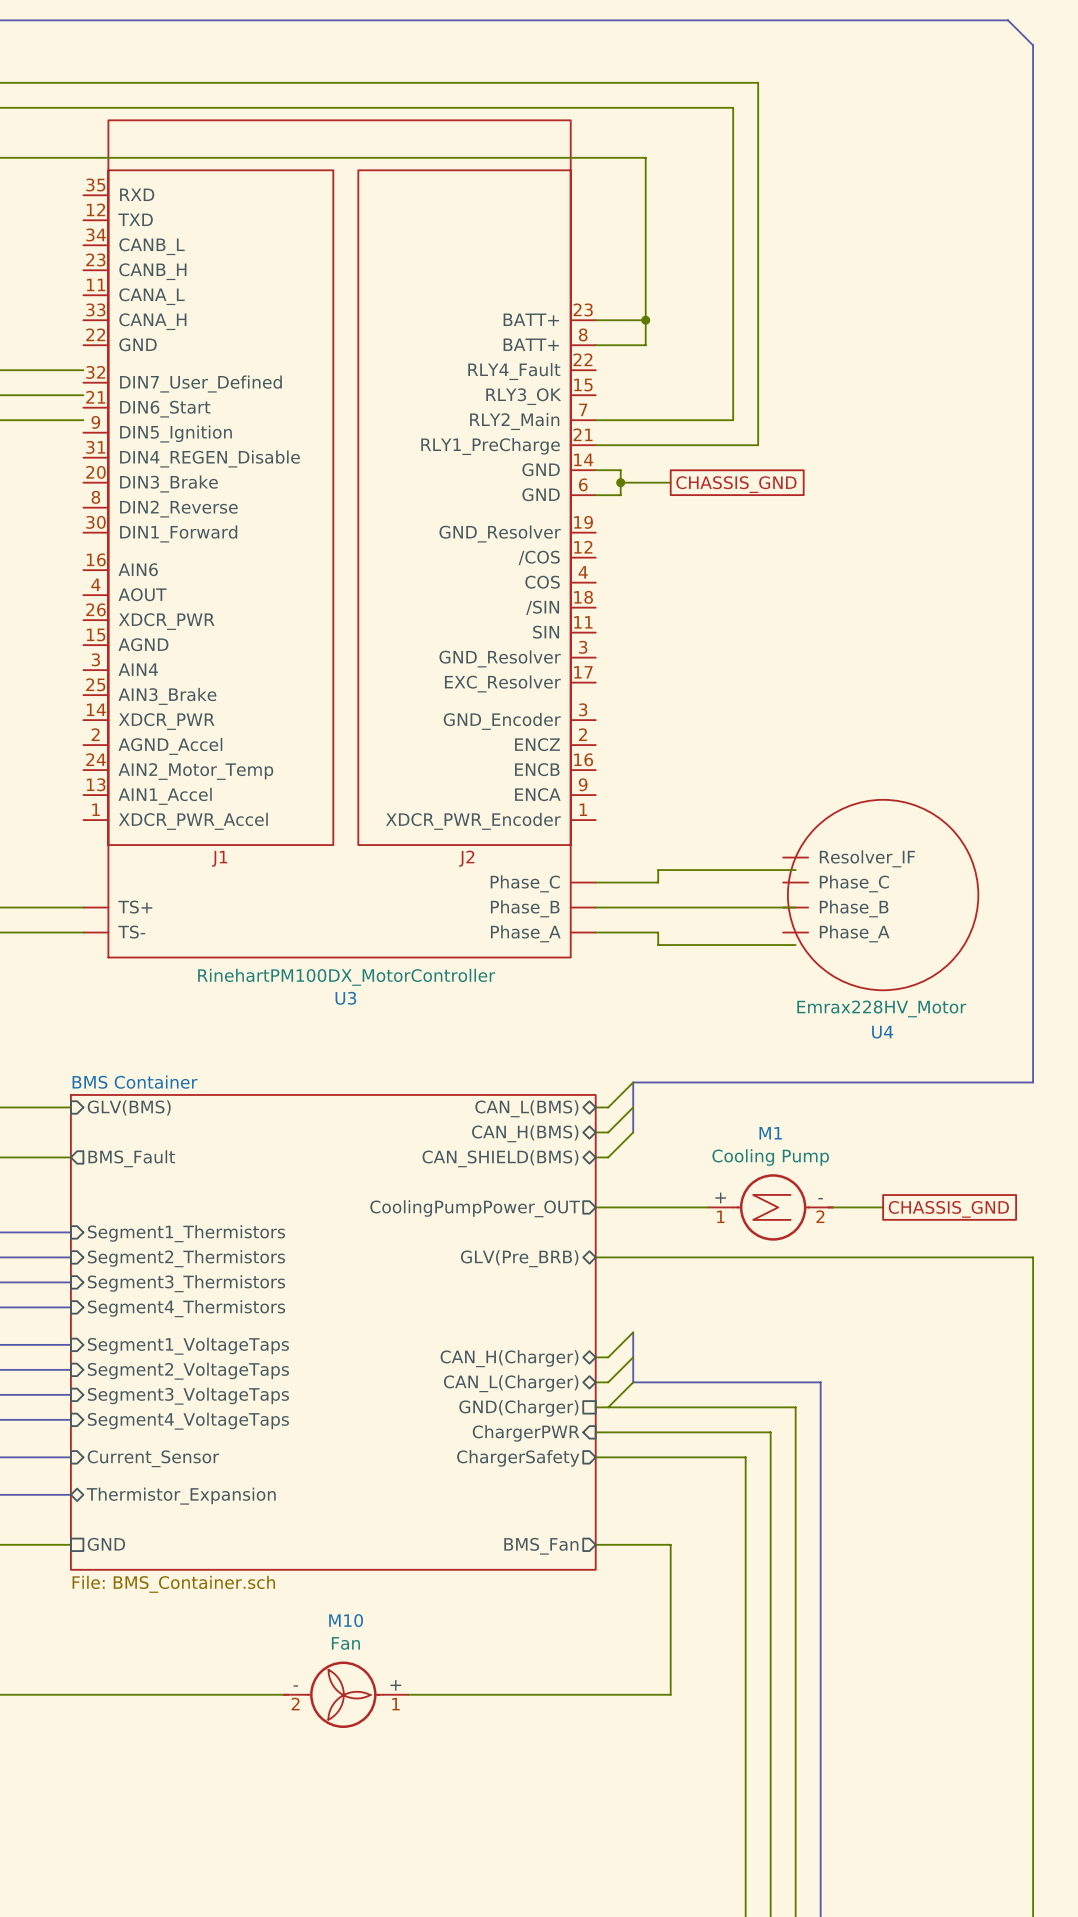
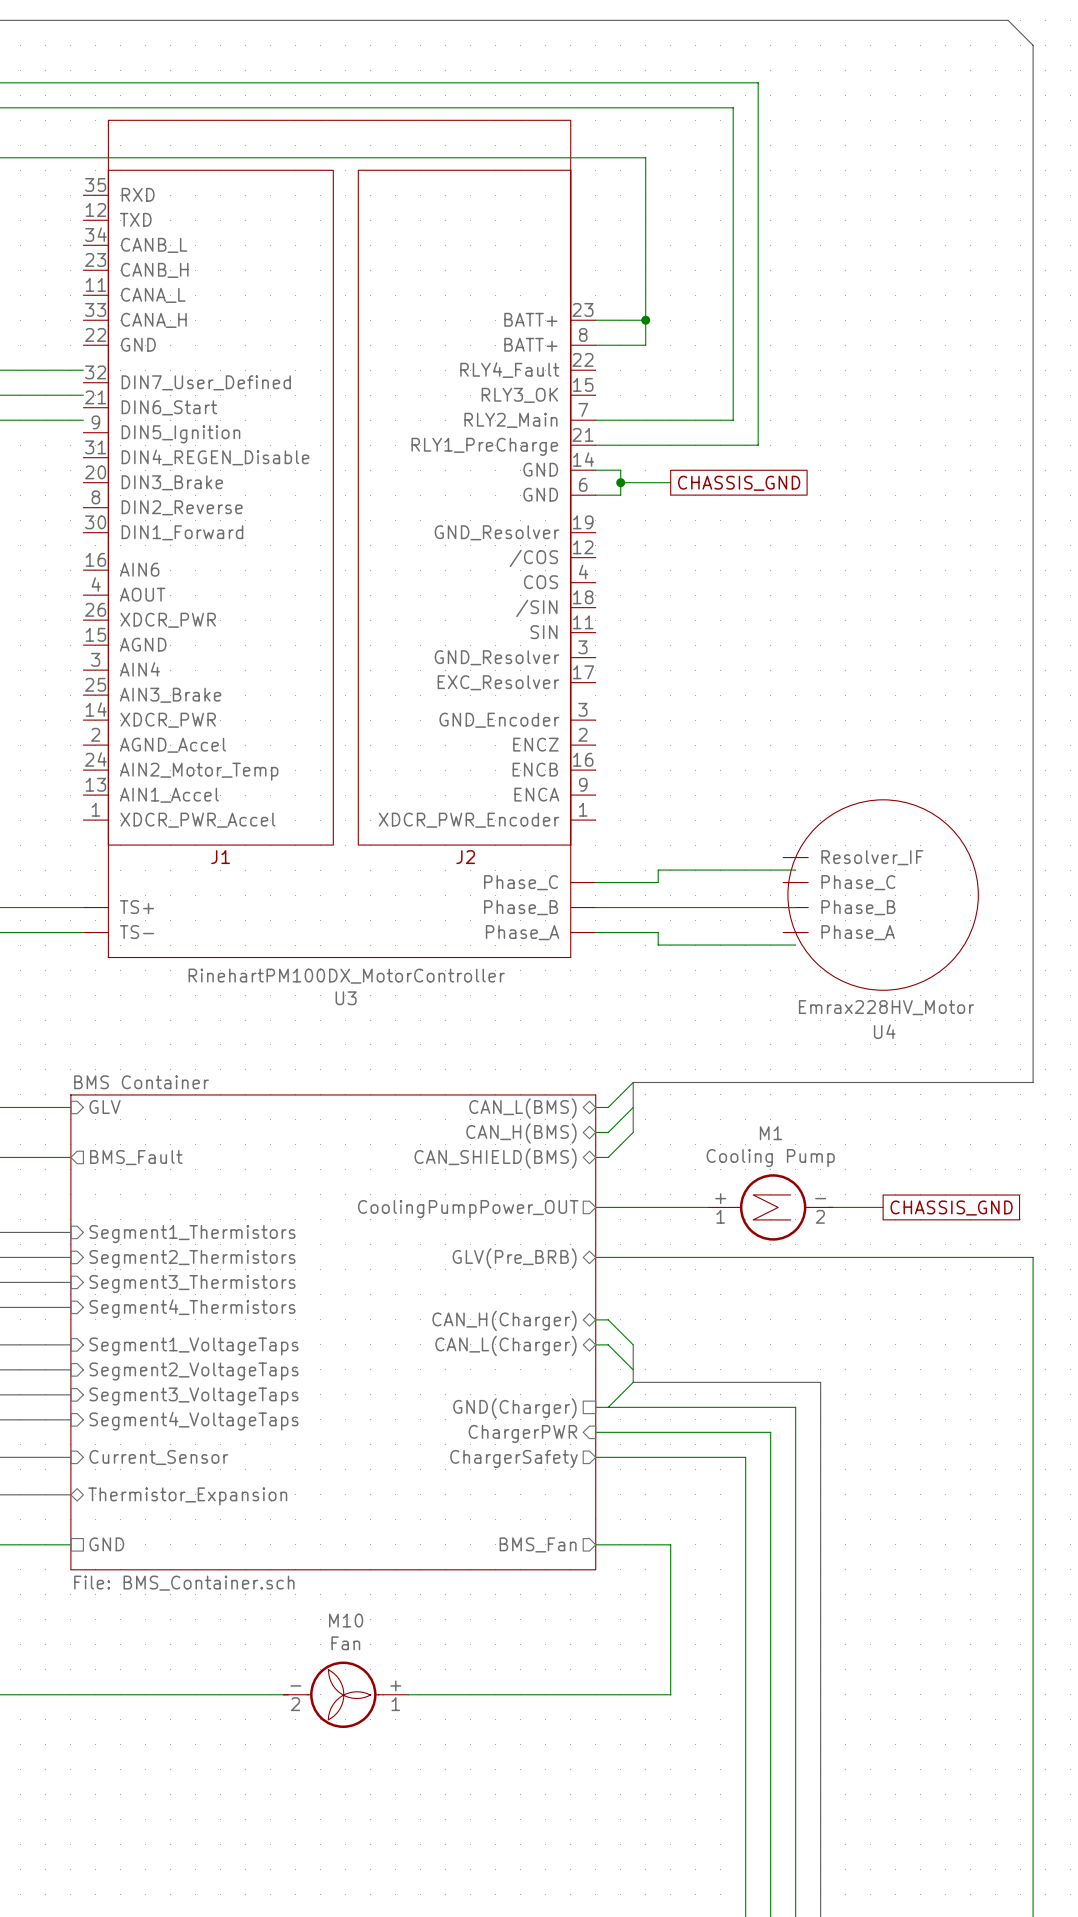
sheet pin: GLV(BMS) (129, 1107) -> GLV (105, 1107)
wire: none -> (595, 1319) (608, 1319) (633, 1344)
wire: (633, 1332) (608, 1357) (595, 1357) -> none
bus: (633, 1332) (633, 1344) -> none
wire: none -> (595, 1344) (608, 1344) (633, 1369)
wire: (633, 1357) (608, 1382) (595, 1382) -> none
sheet pin position: CAN_H(Charger) (509, 1358) -> CAN_H(Charger) (504, 1320)
sheet pin position: CAN_L(Charger) (511, 1383) -> CAN_L(Charger) (505, 1345)

